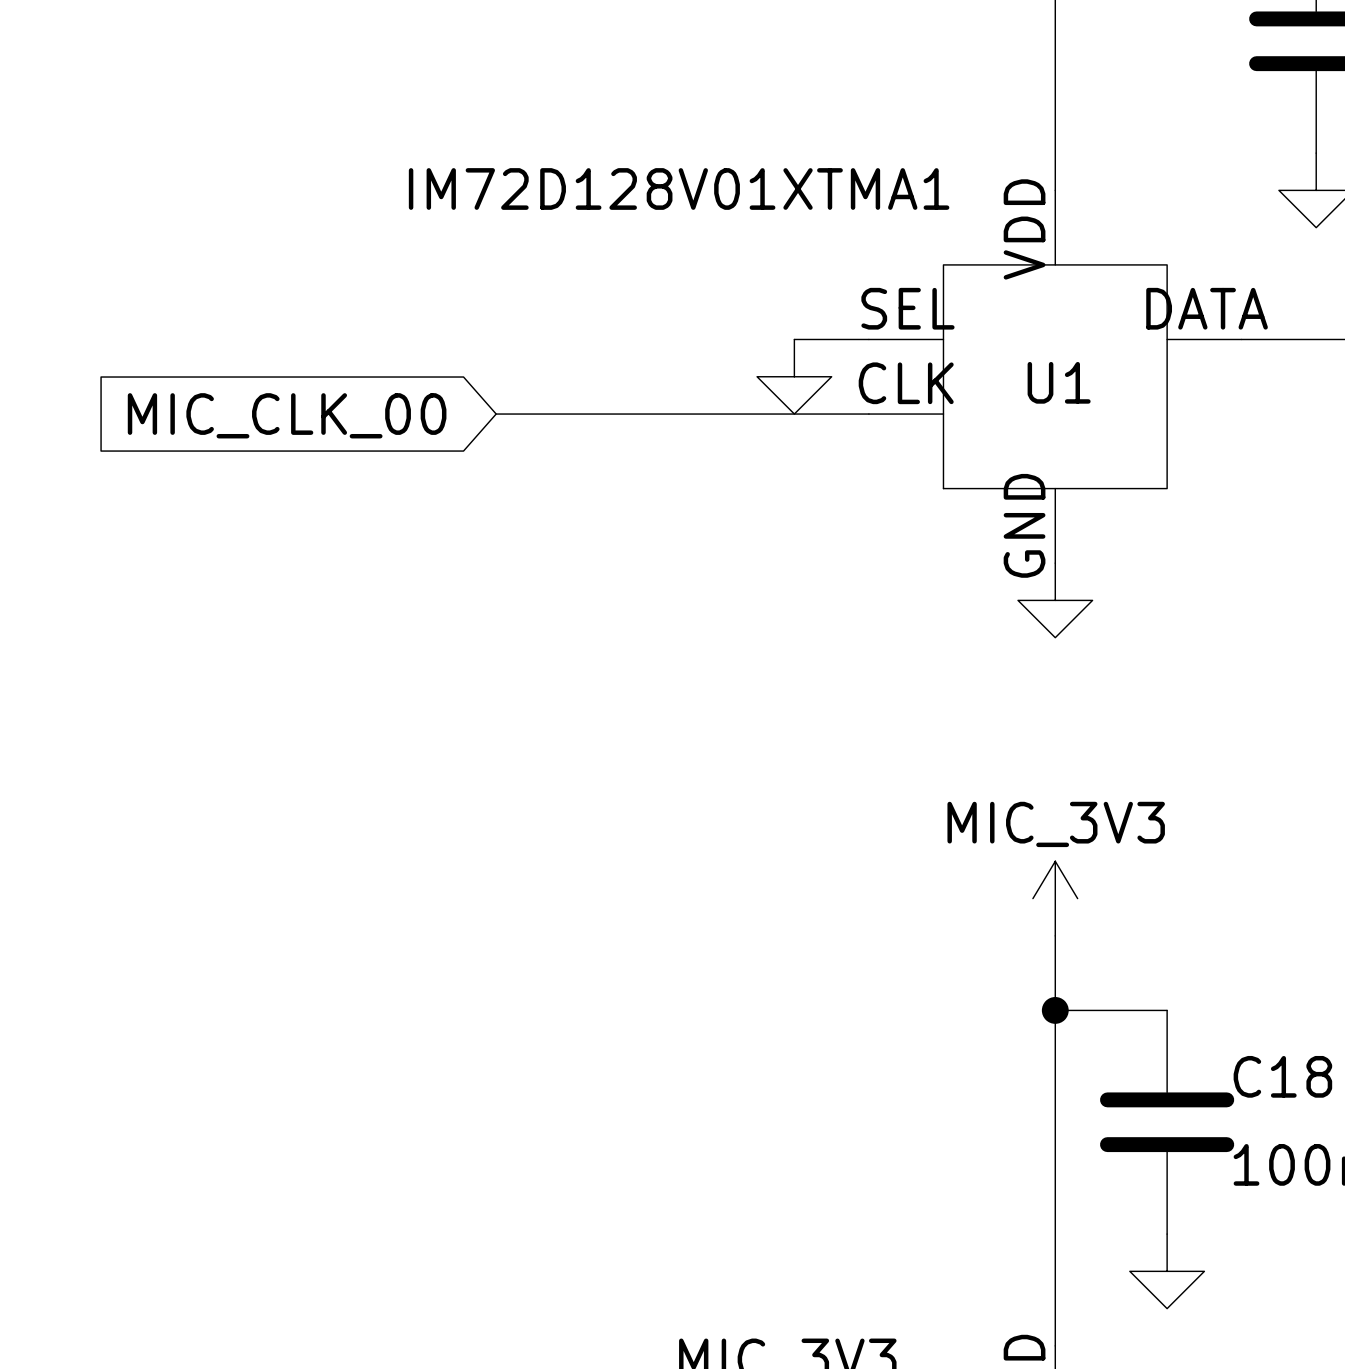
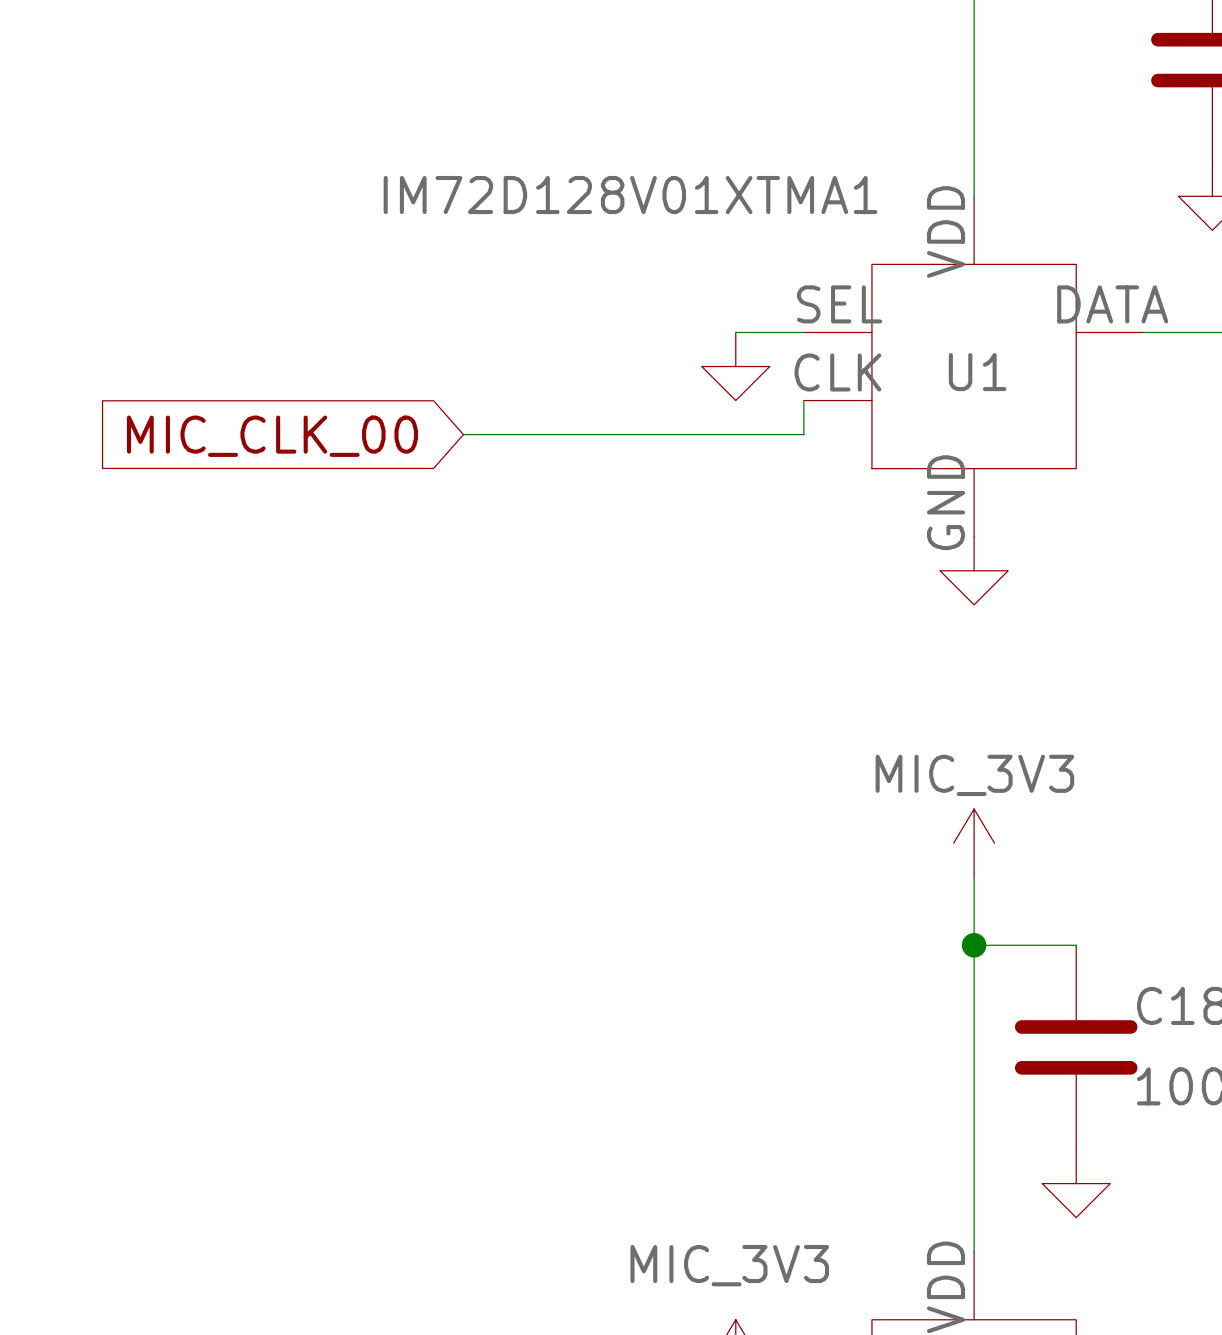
wire: (496, 414) (868, 414) -> (463, 434) (803, 434) (803, 400)
global label position: MIC_CLK_00 (287, 415) -> MIC_CLK_00 (272, 436)

